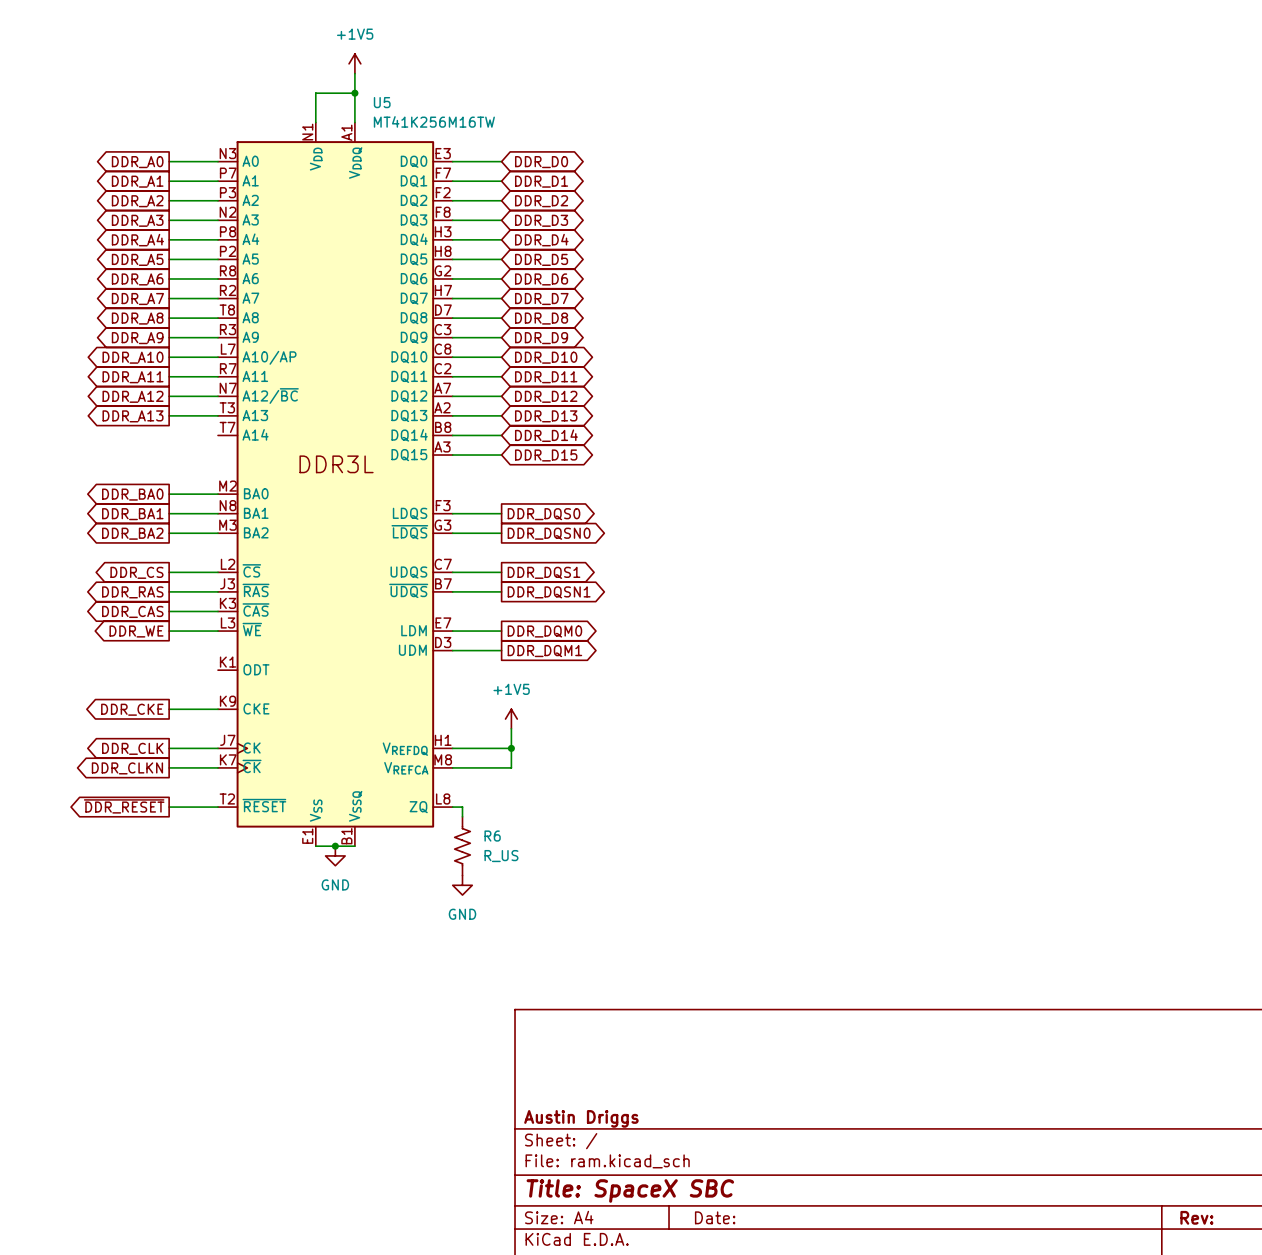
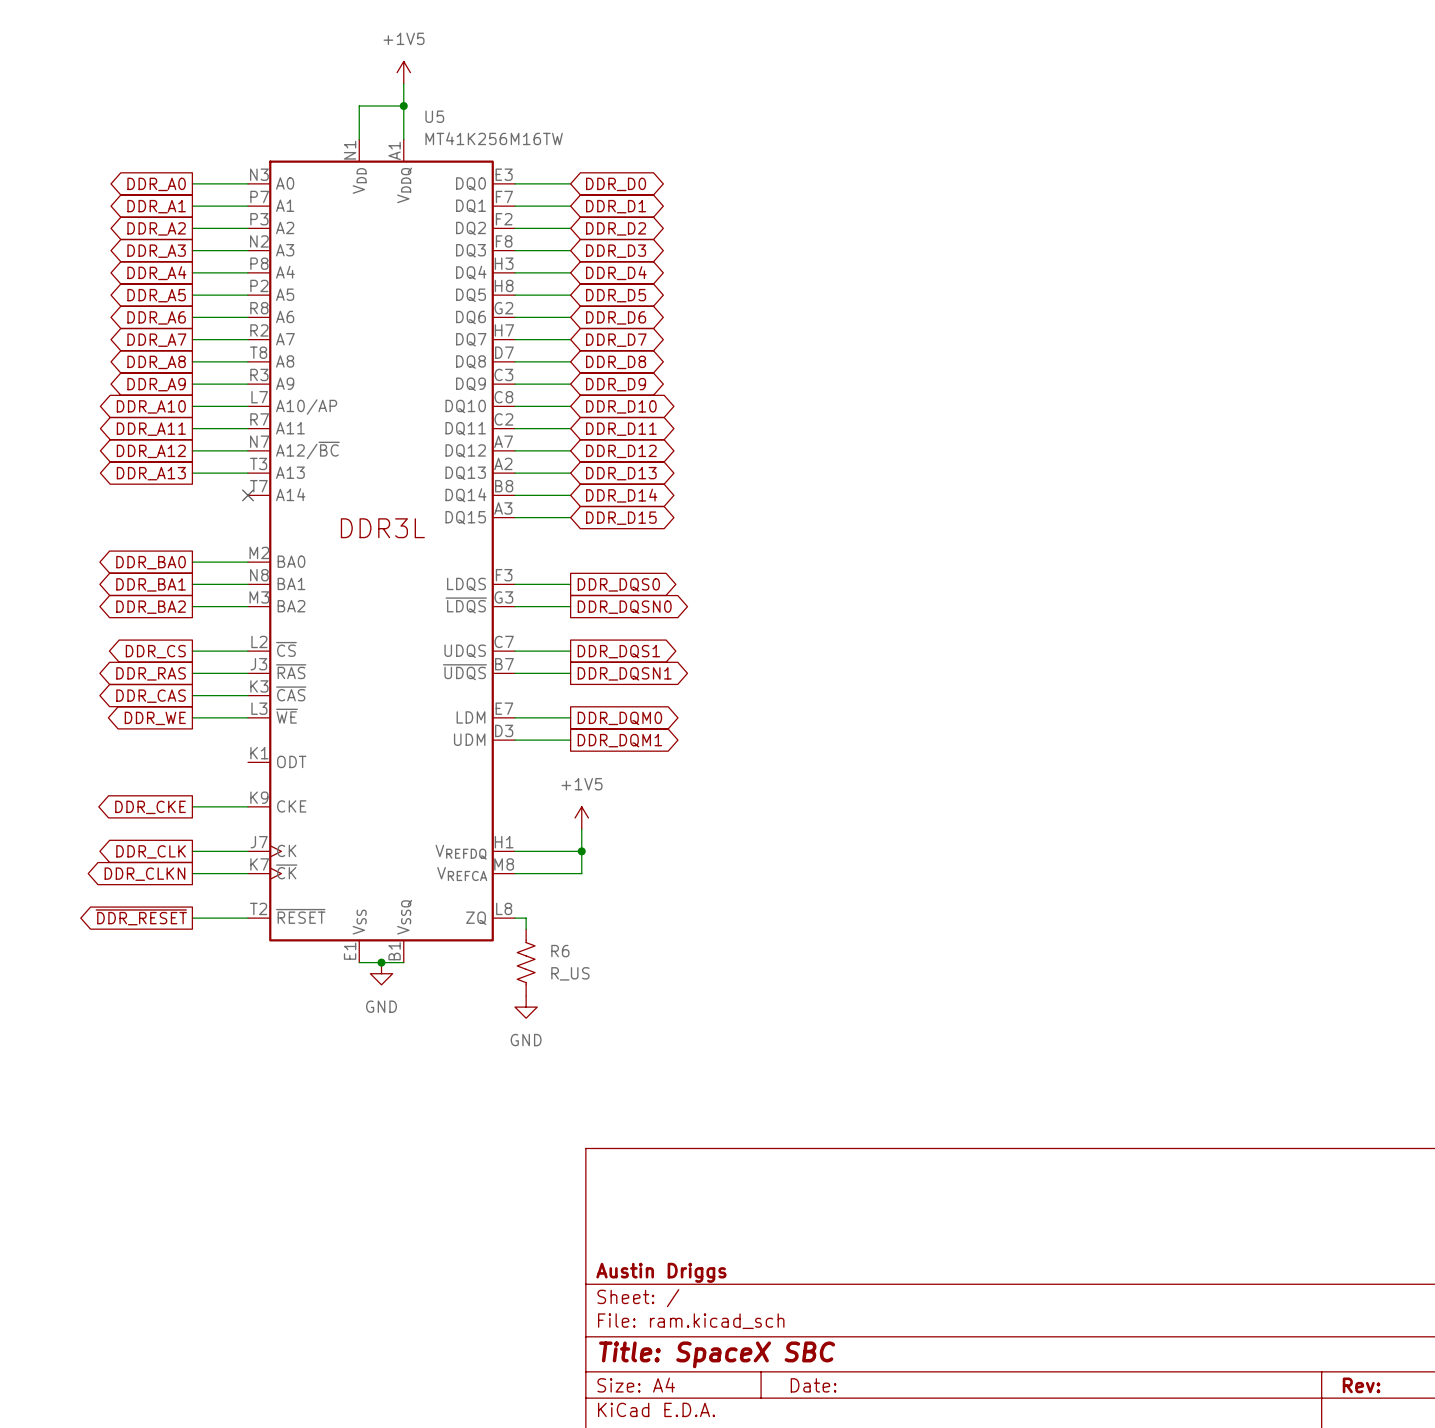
no-connect mark: none -> (248, 495)

